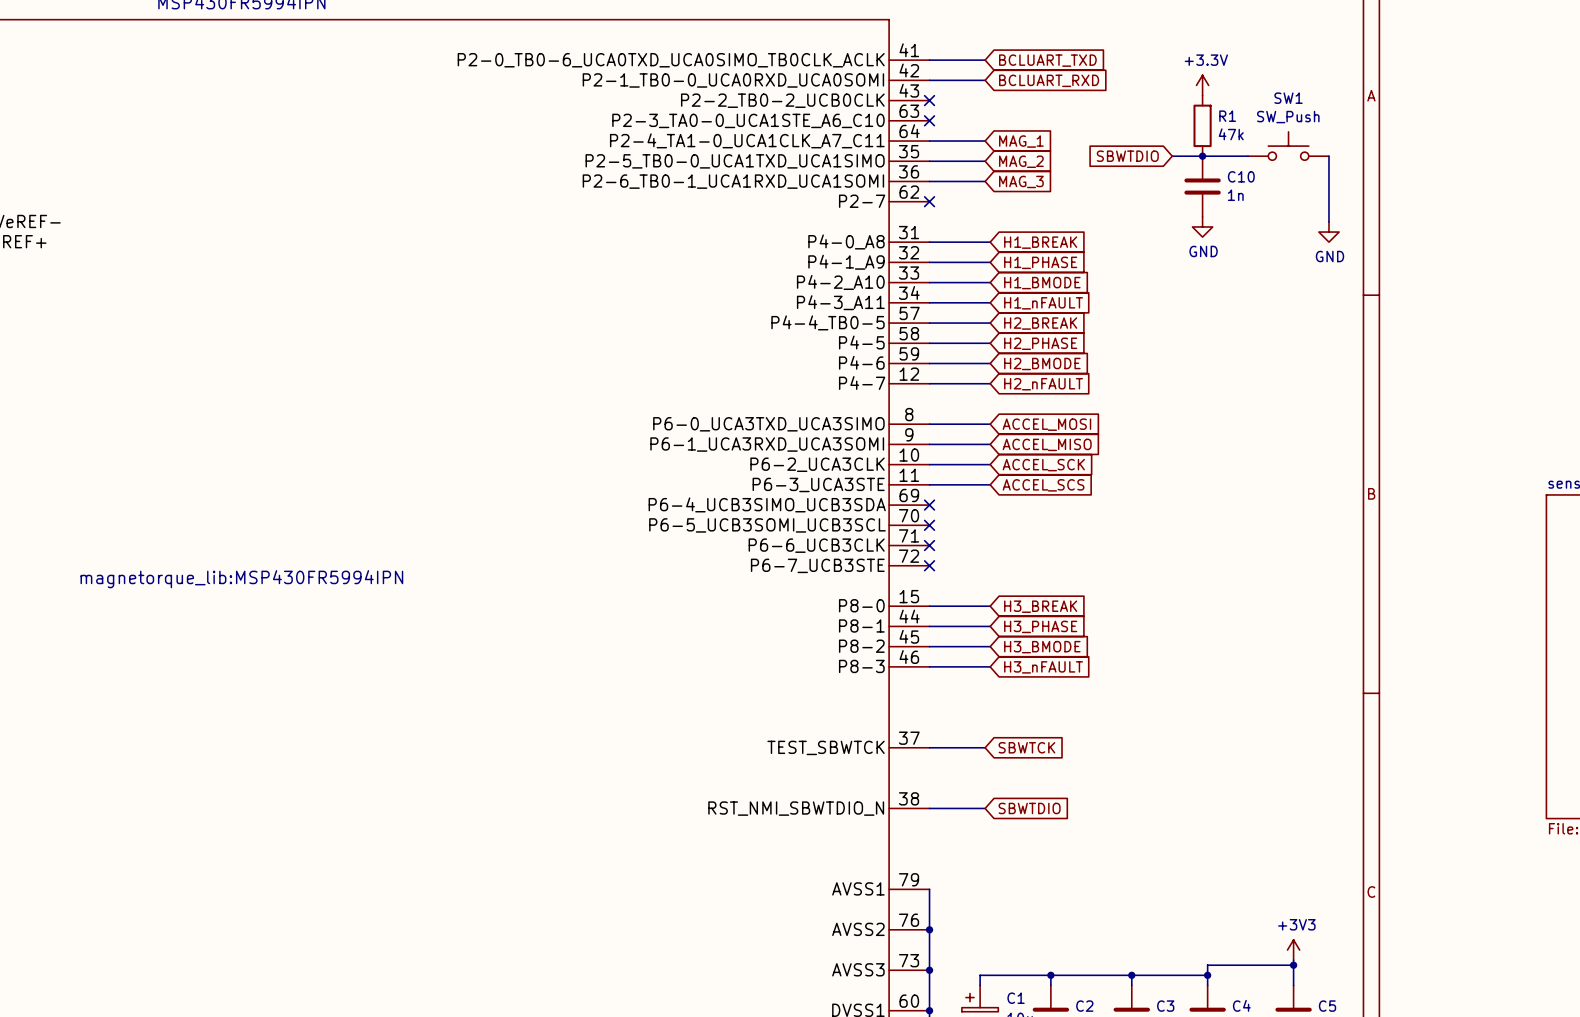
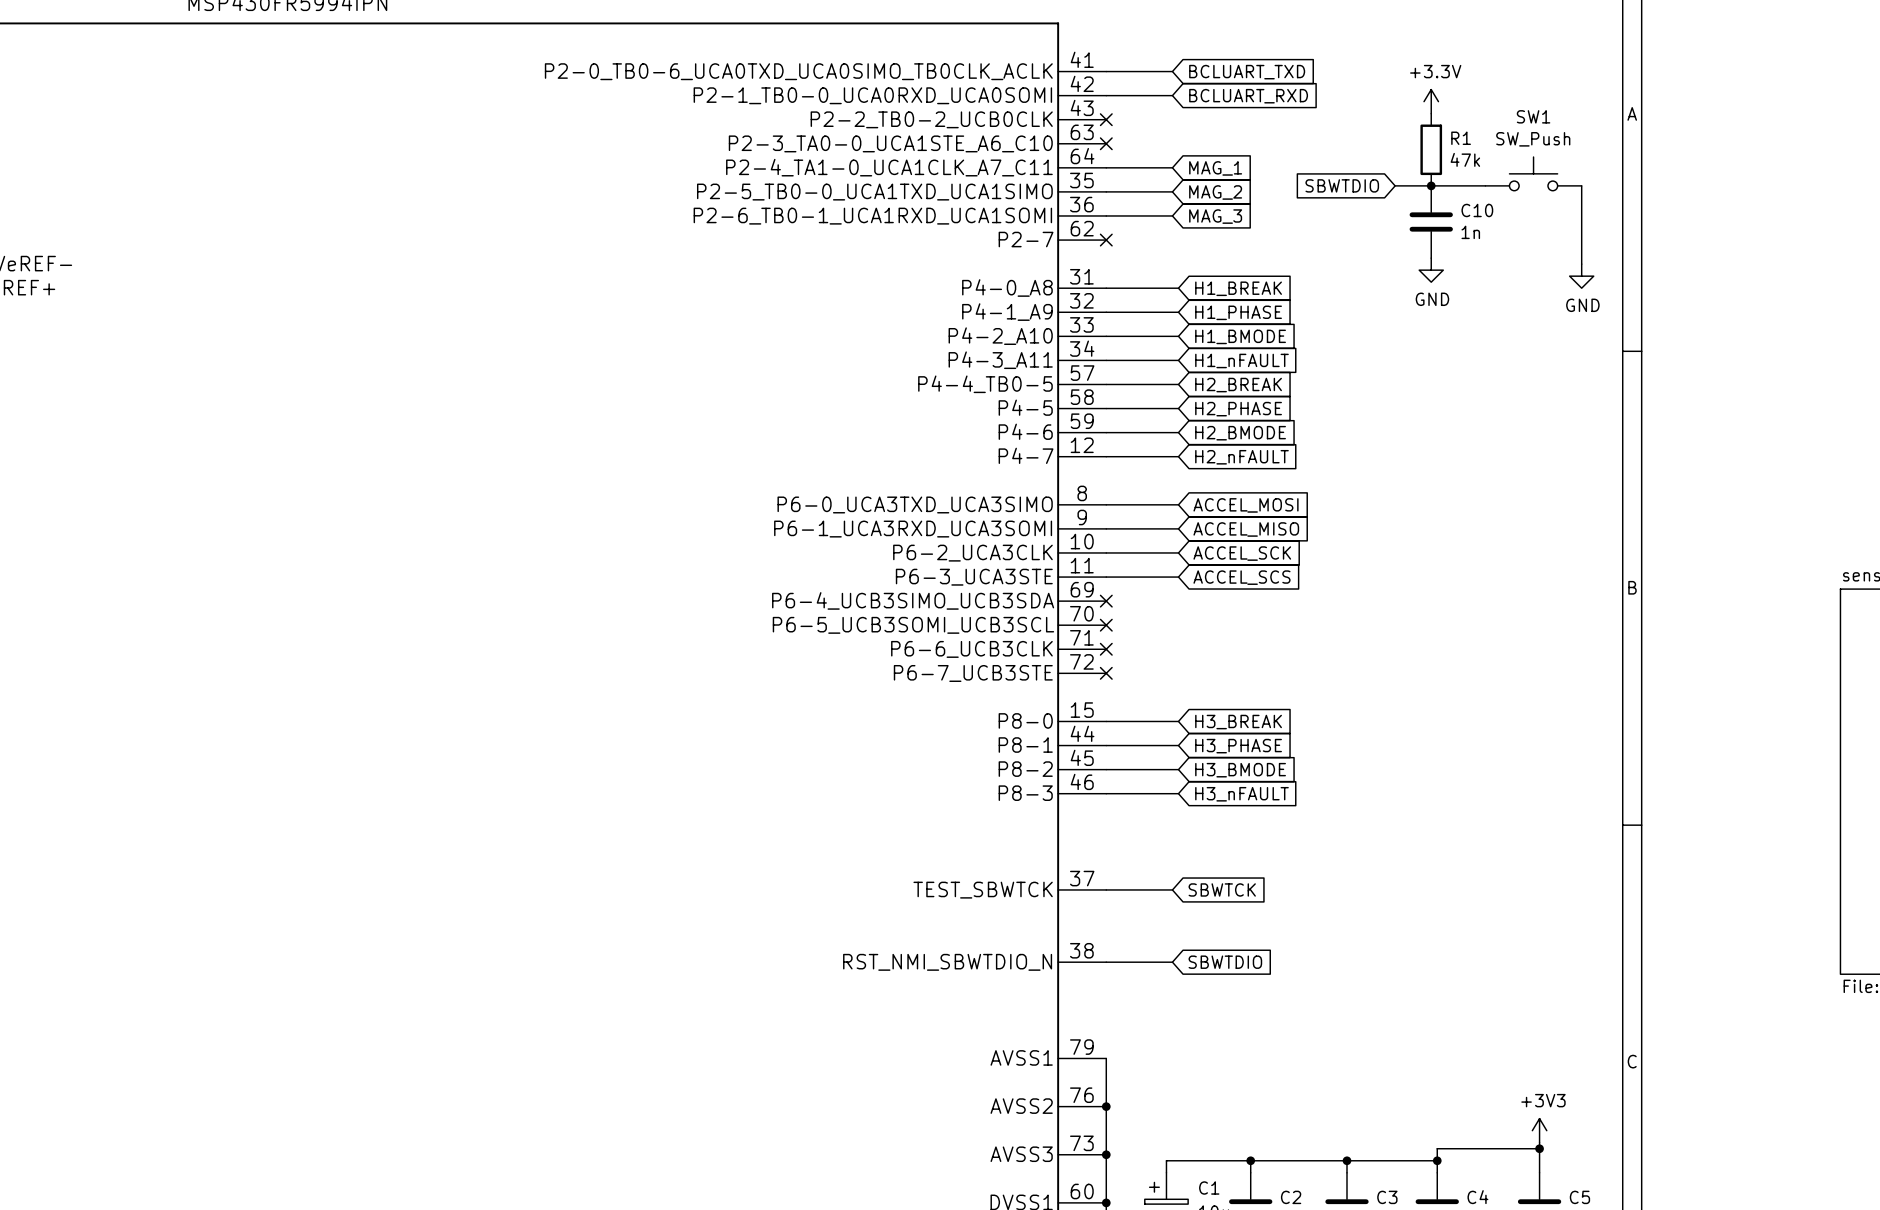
part text: magnetorque_lib:MSP430FR5994IPN (241, 579) -> none

